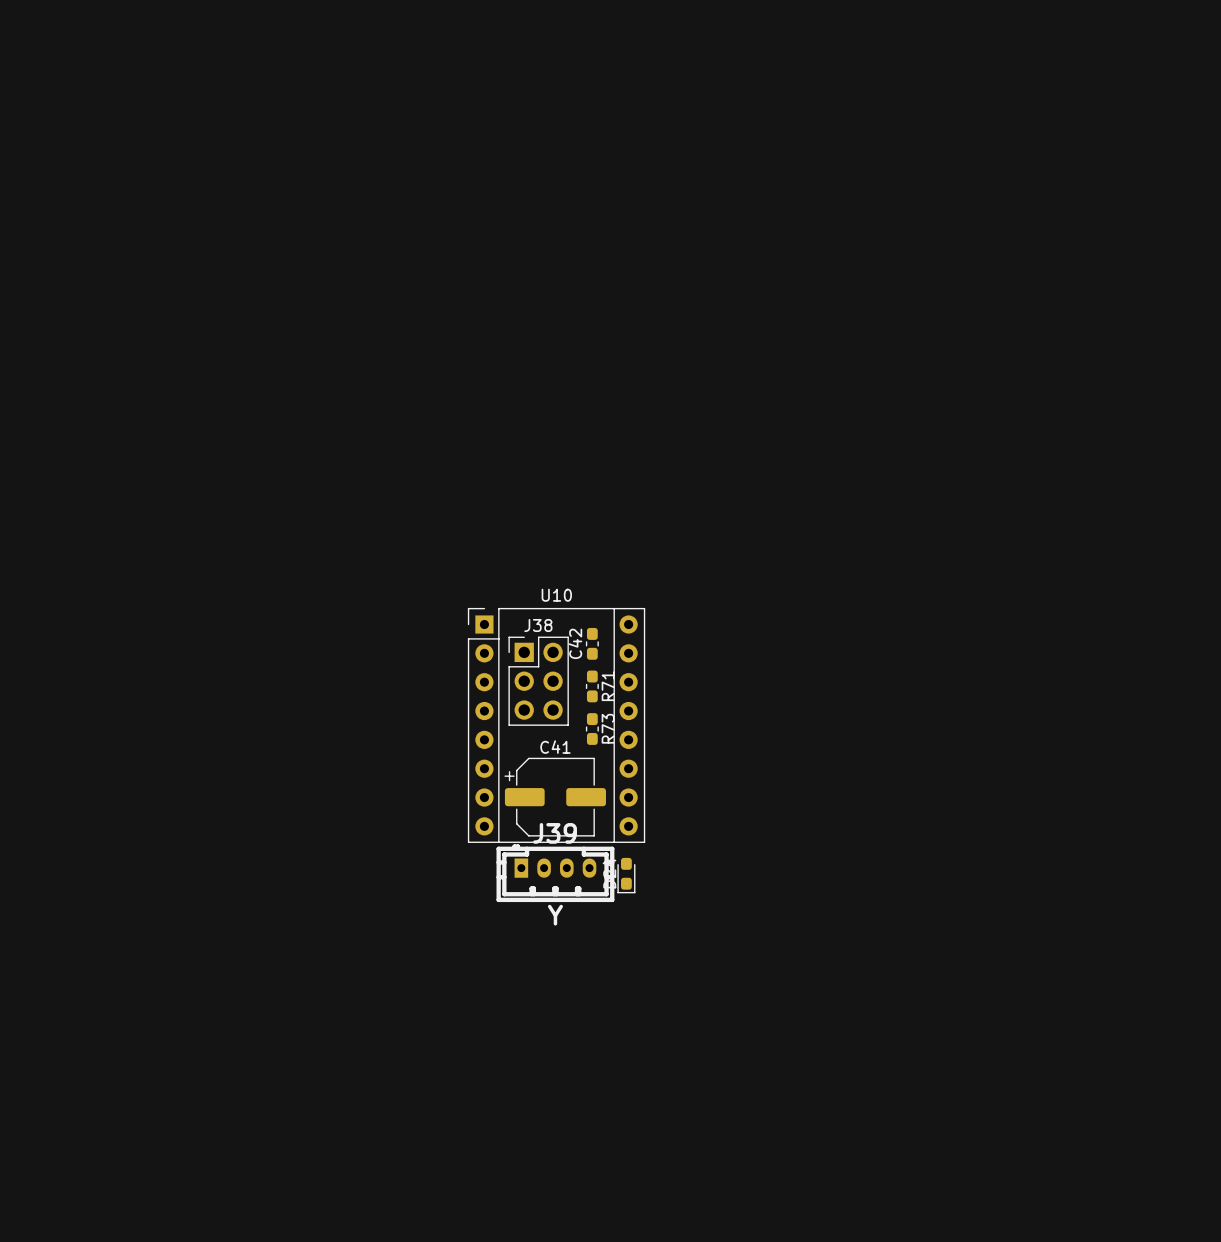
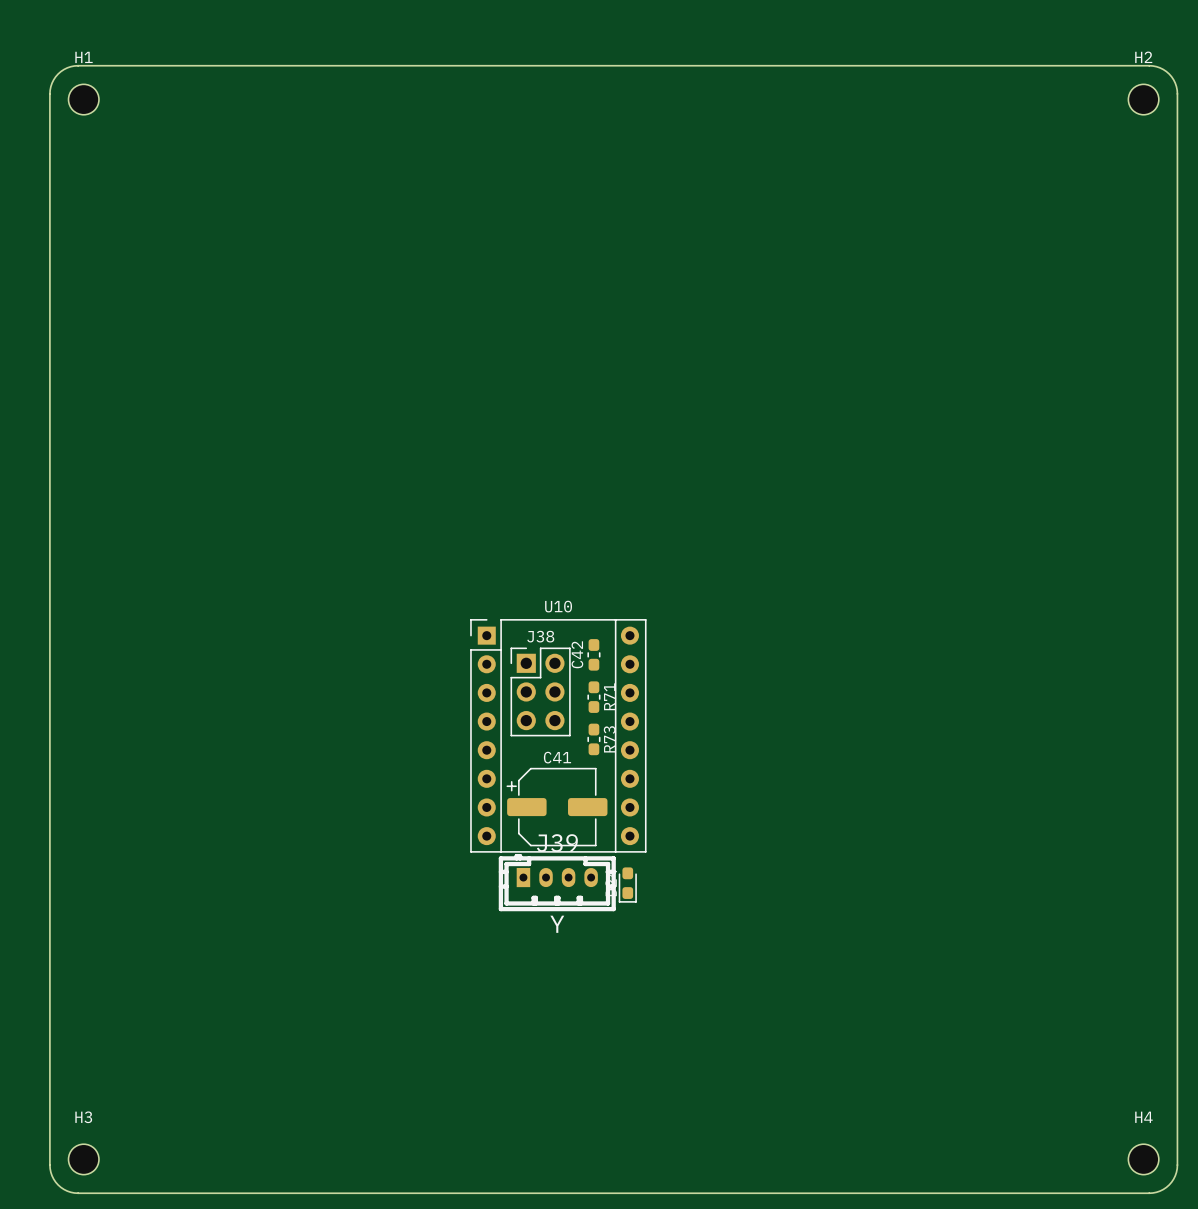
board edge: none -> (78, 65) (1149, 65) (1160, 67) (1169, 73) (1175, 83) (1177, 93) (1177, 1165) (1175, 1175) (1169, 1184) (1160, 1191) (1149, 1193) (78, 1193) (67, 1191) (58, 1184) (52, 1175) (49, 1165) (49, 93) (52, 83) (58, 73) (67, 67) (78, 65)
H1: none -> (83, 99)
H2: none -> (1143, 99)
H3: none -> (83, 1159)
H4: none -> (1143, 1159)

